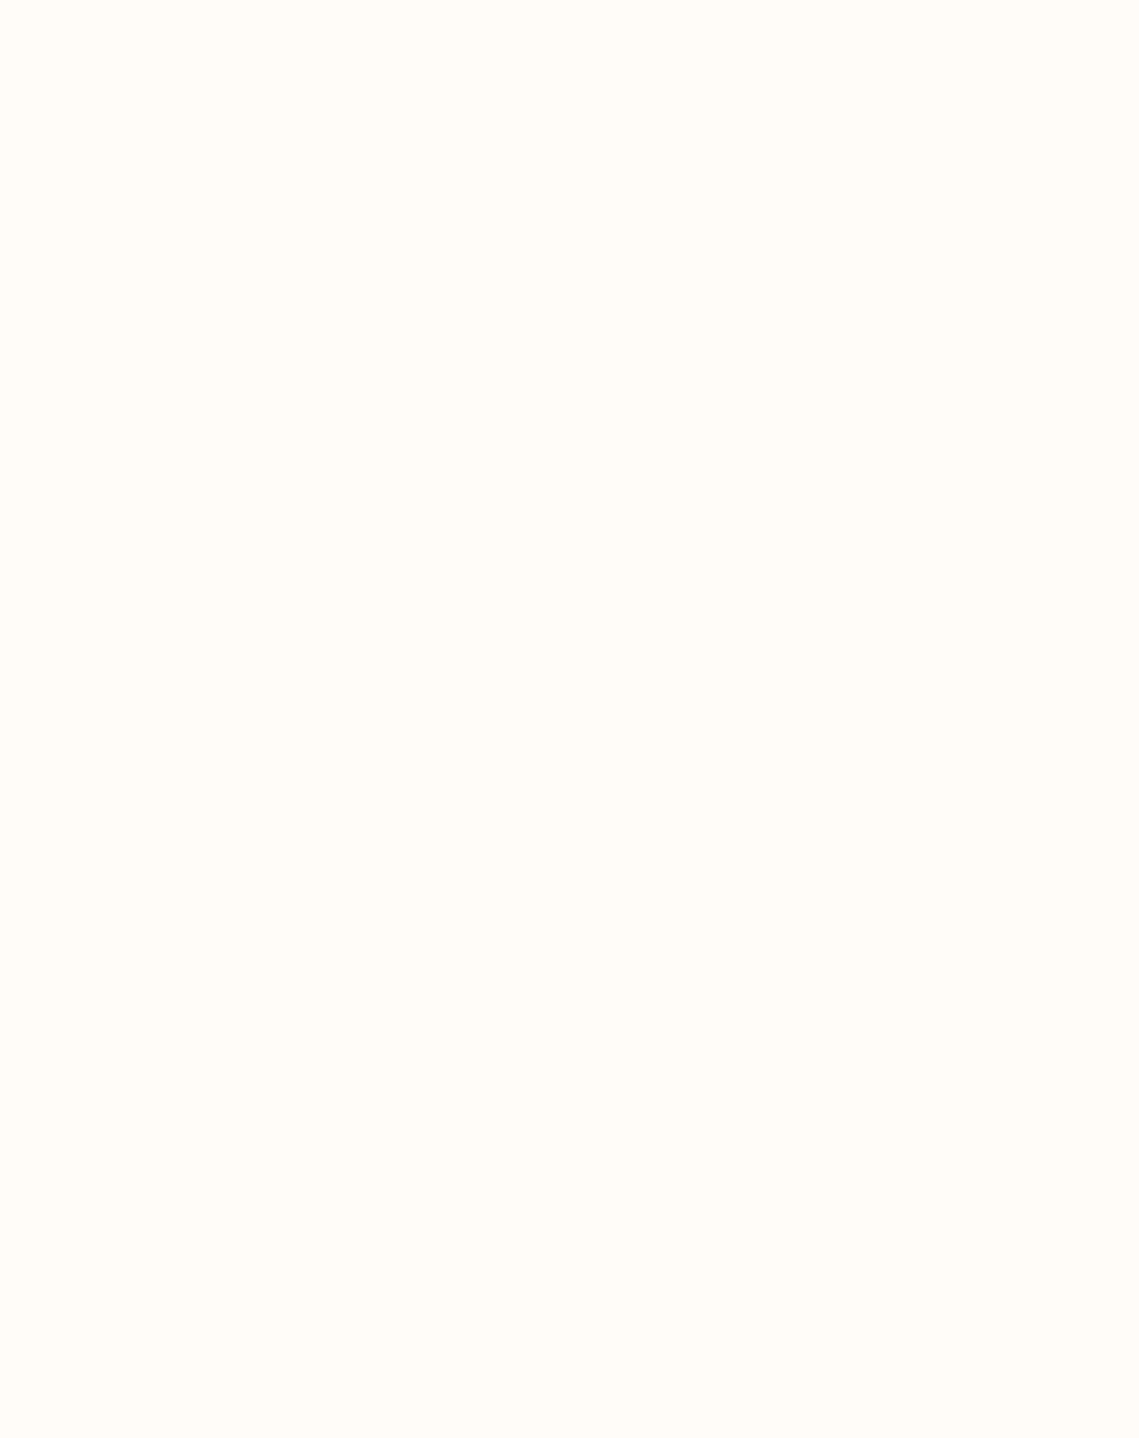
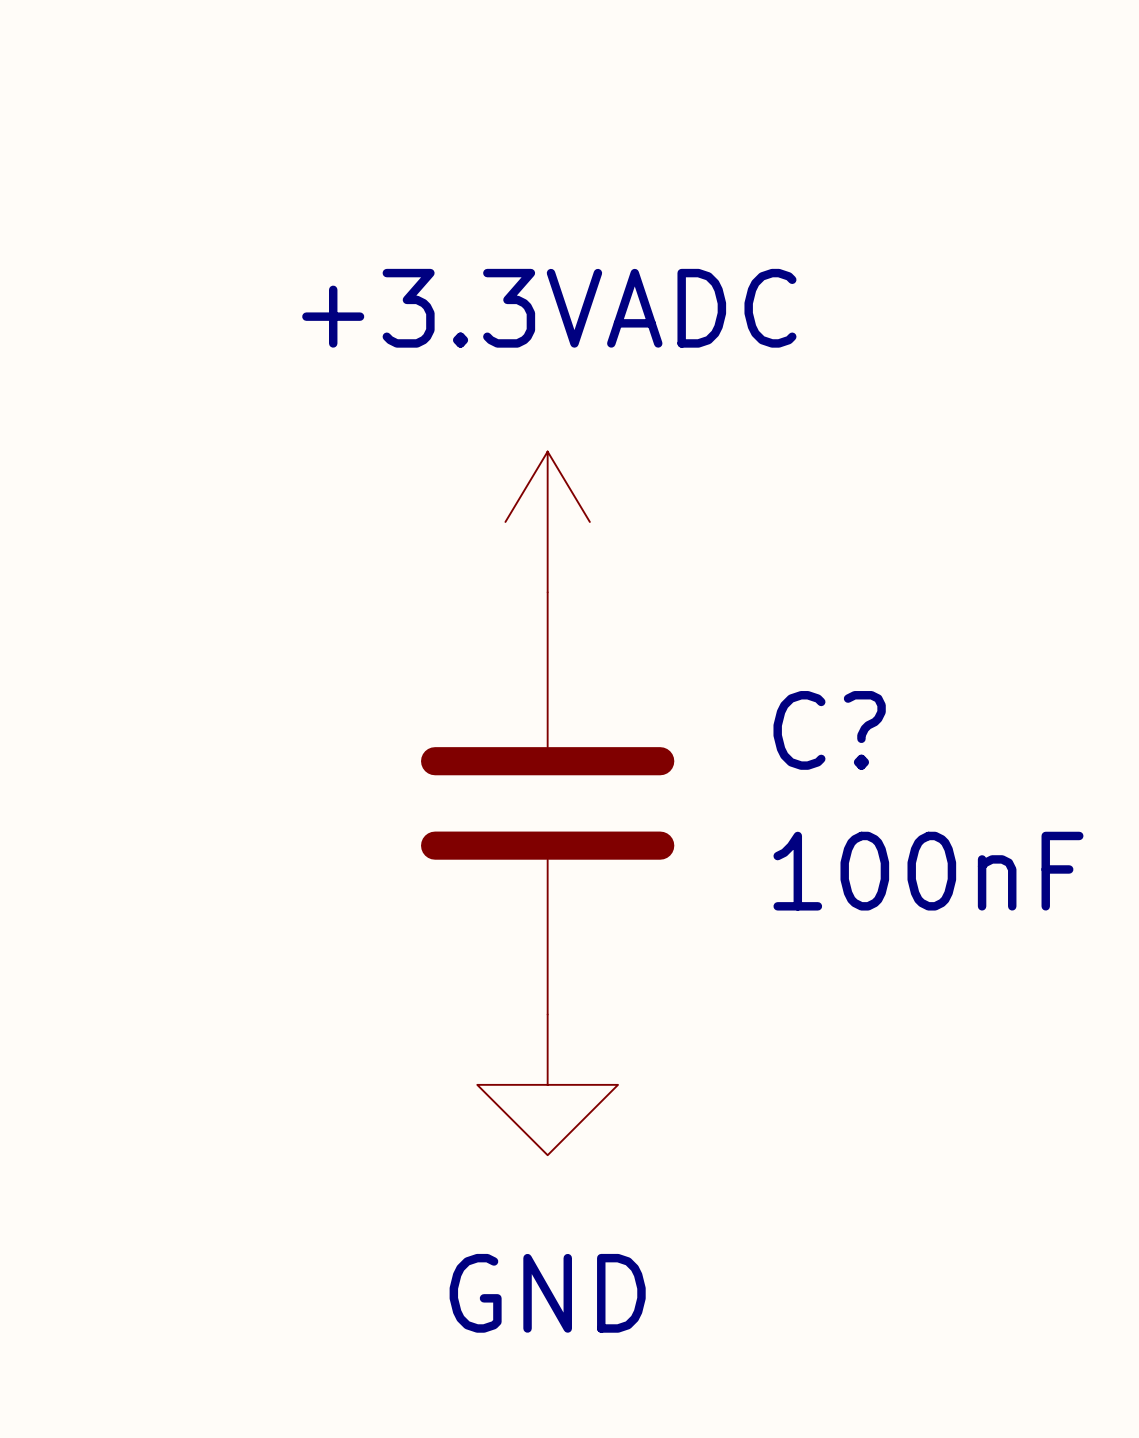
power symbol: none -> +3.3VADC (547, 521)
C?: none -> 100nF (547, 803)
power symbol: none -> GND (547, 1084)

